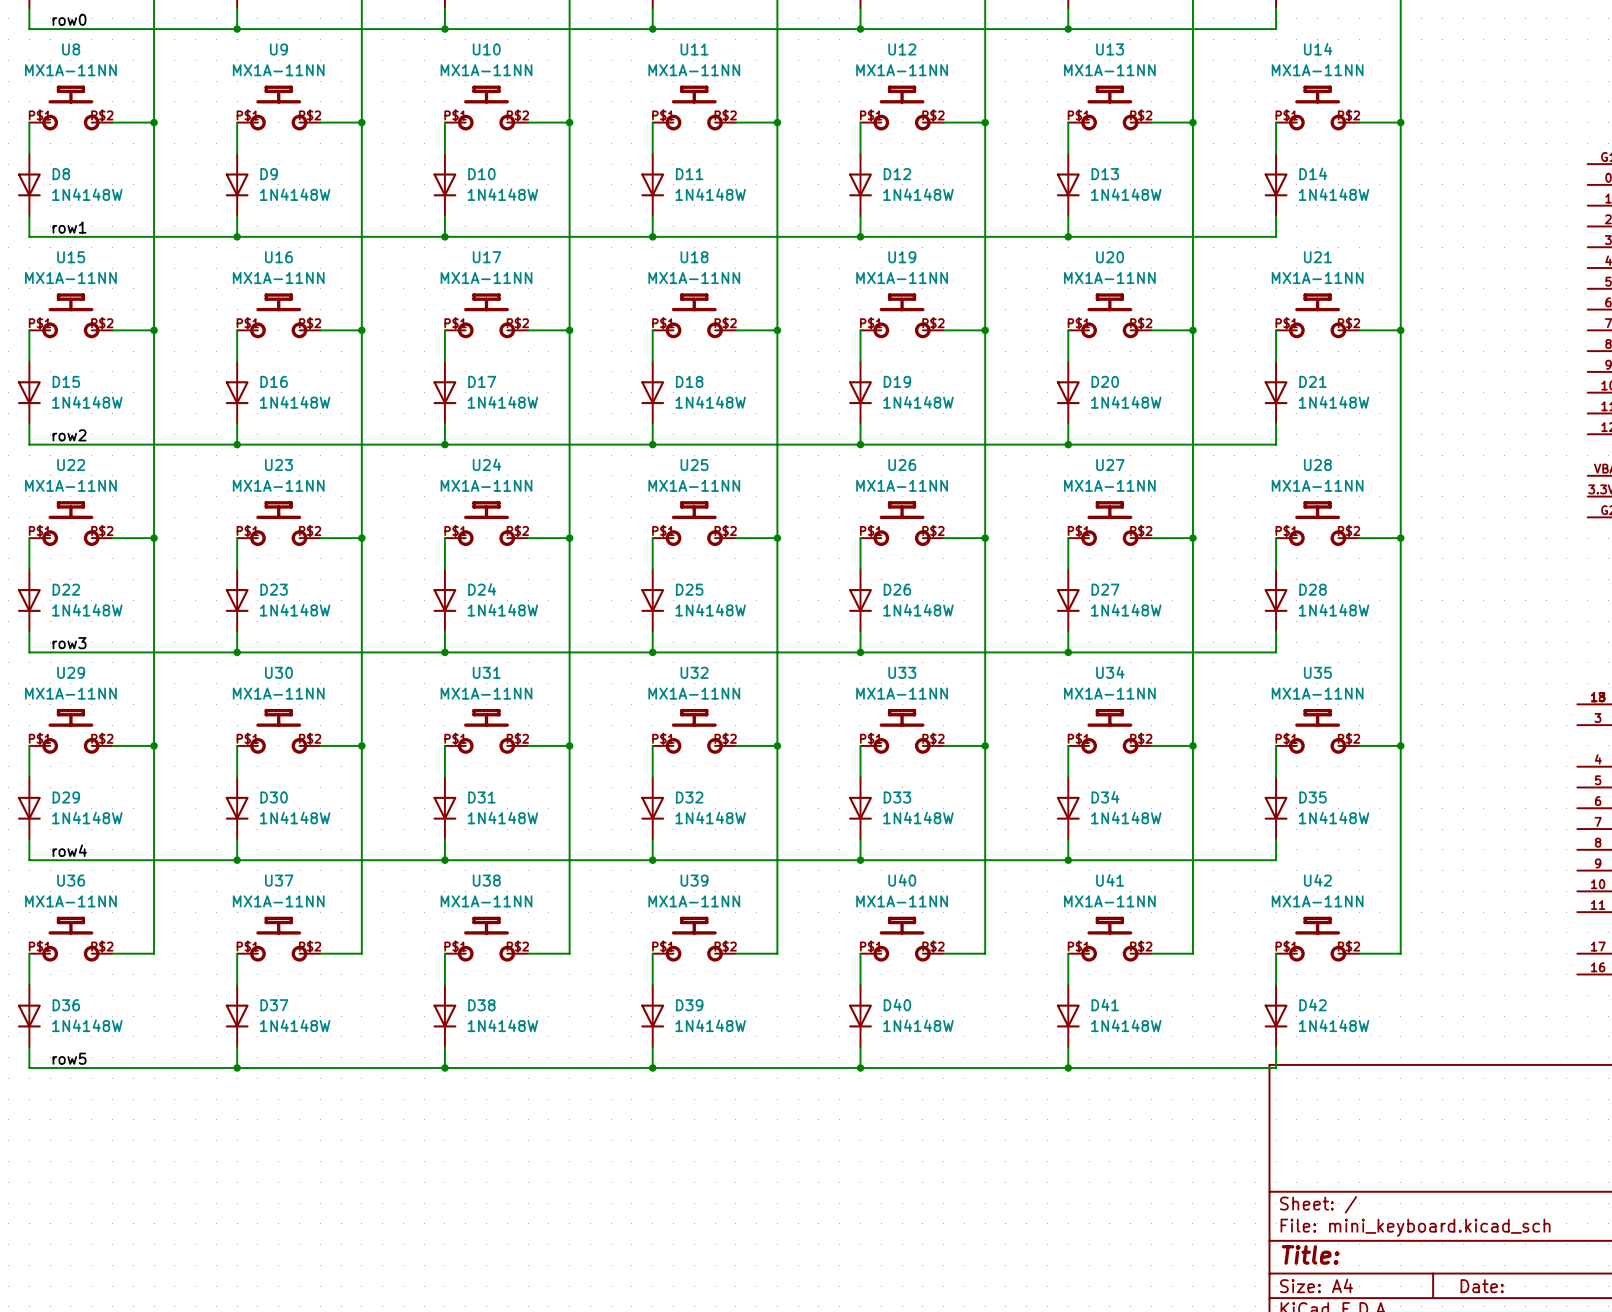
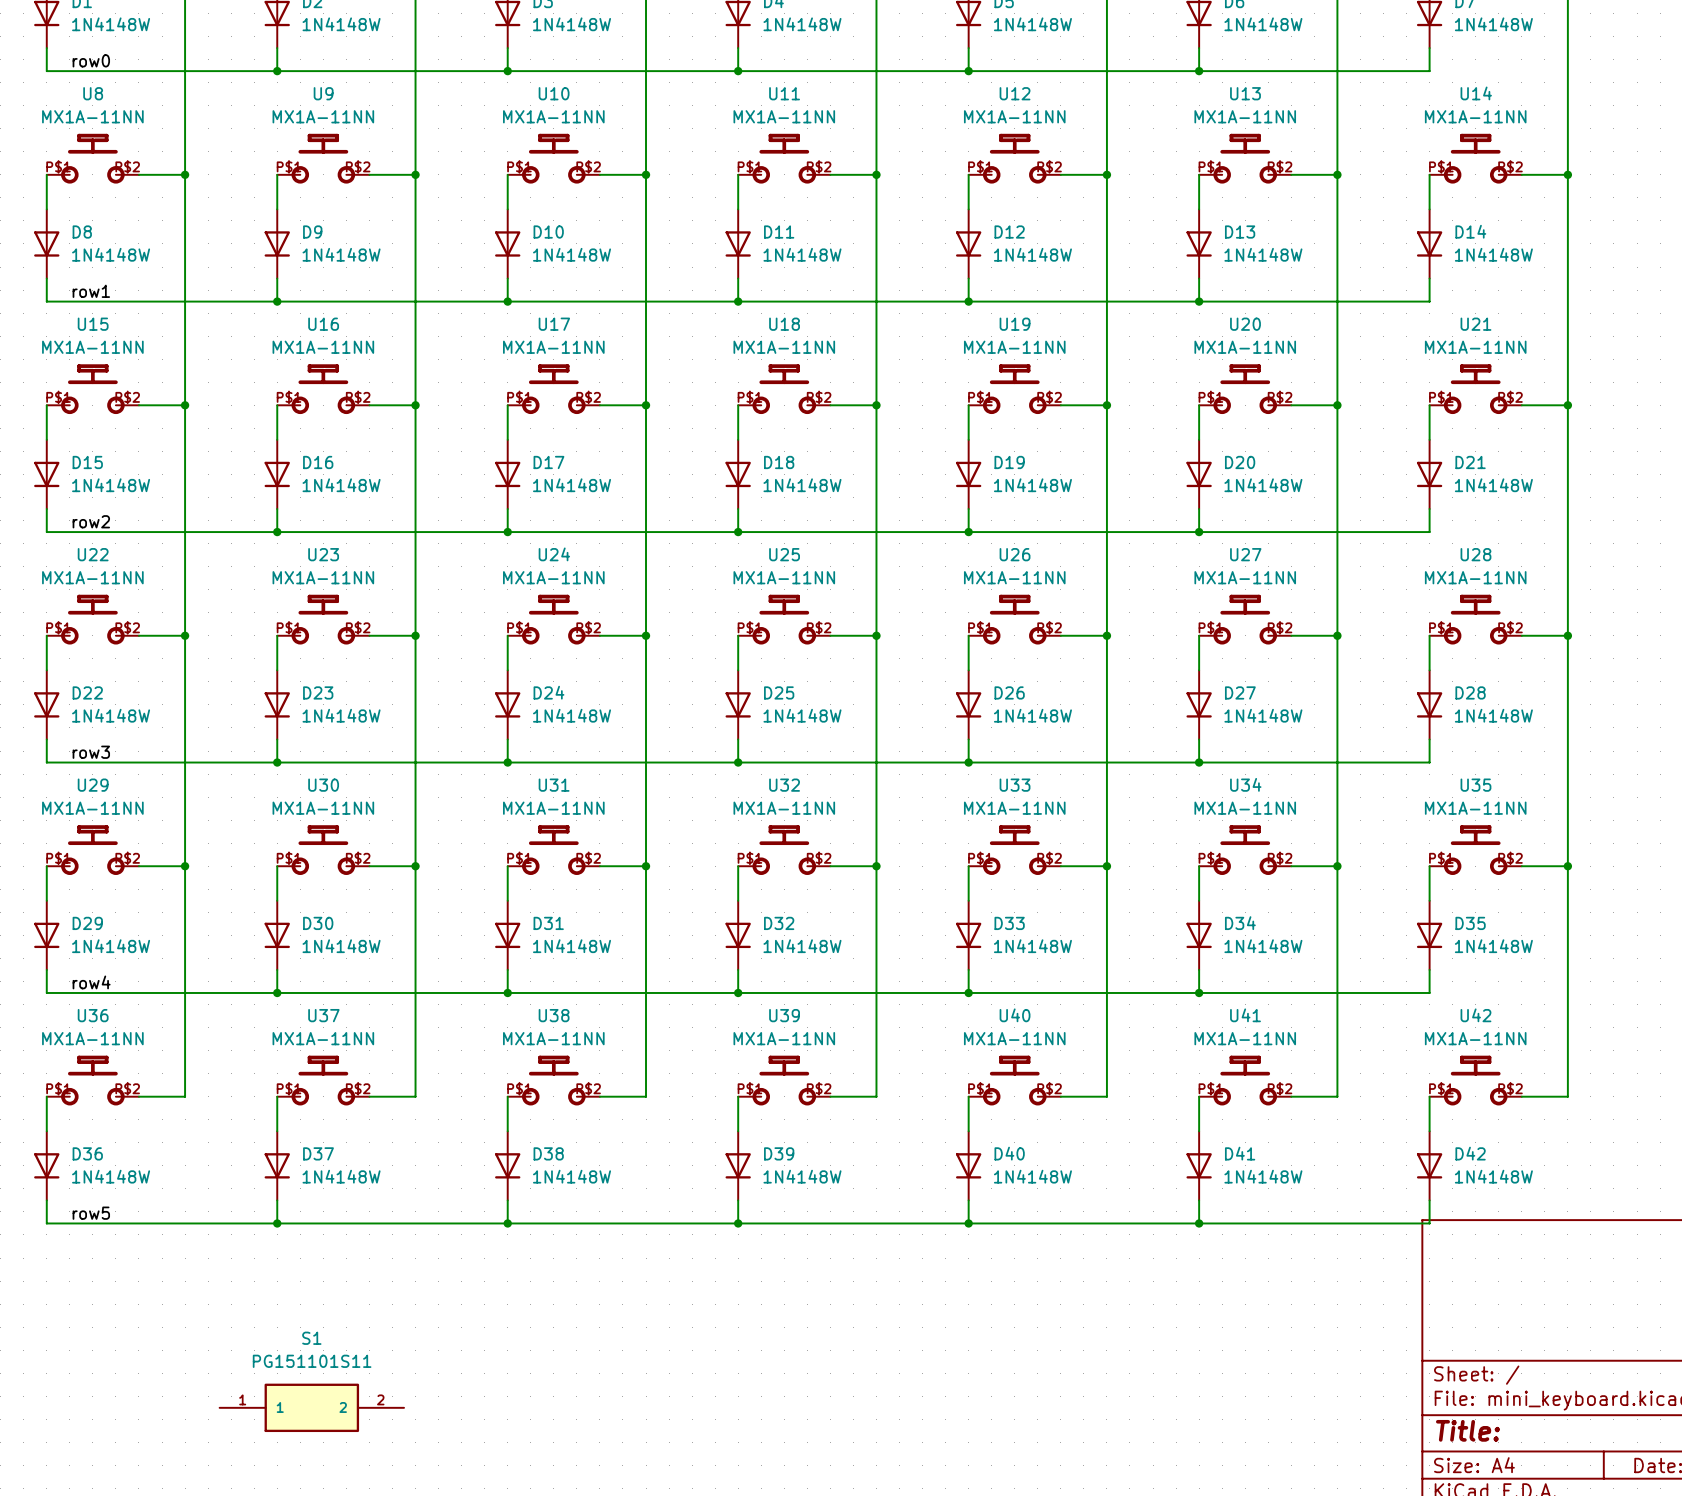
S1: none -> PG151101S11 (311, 1407)

